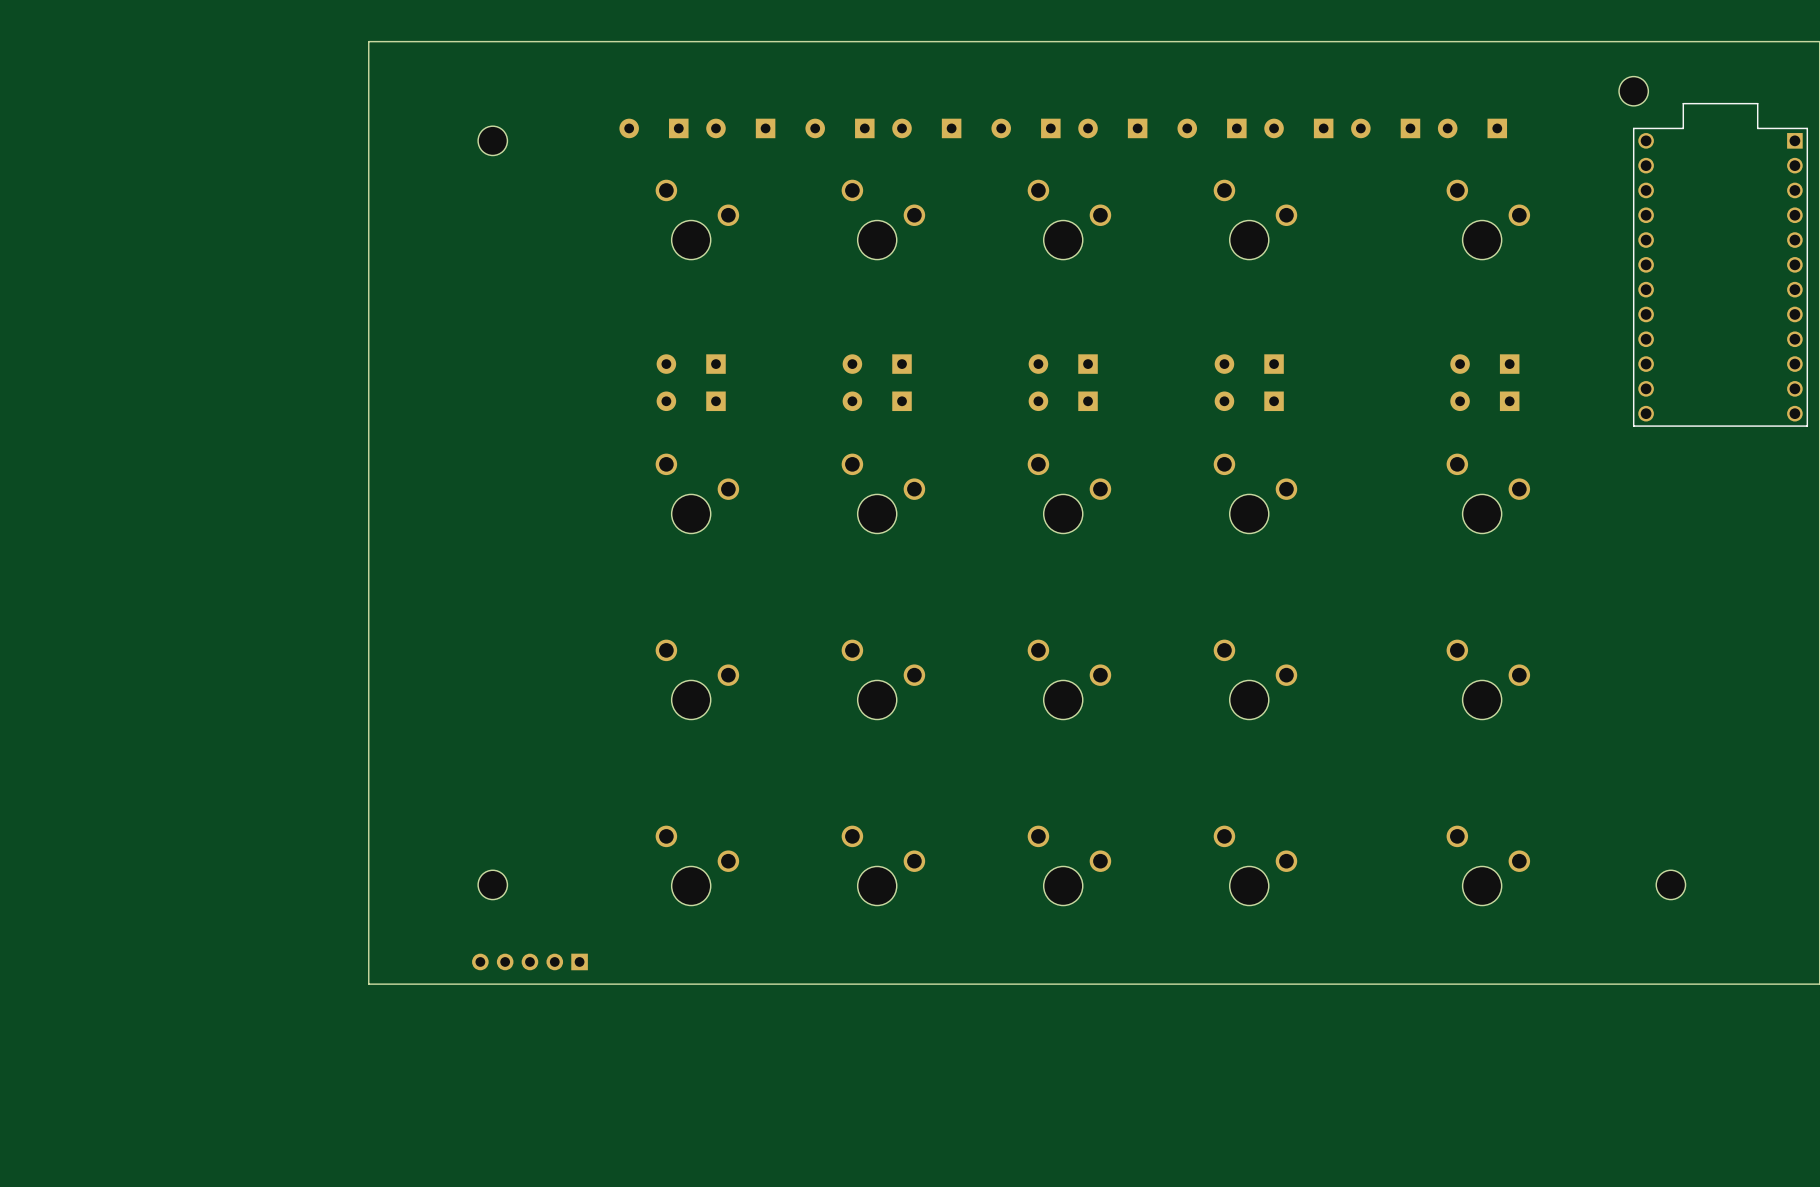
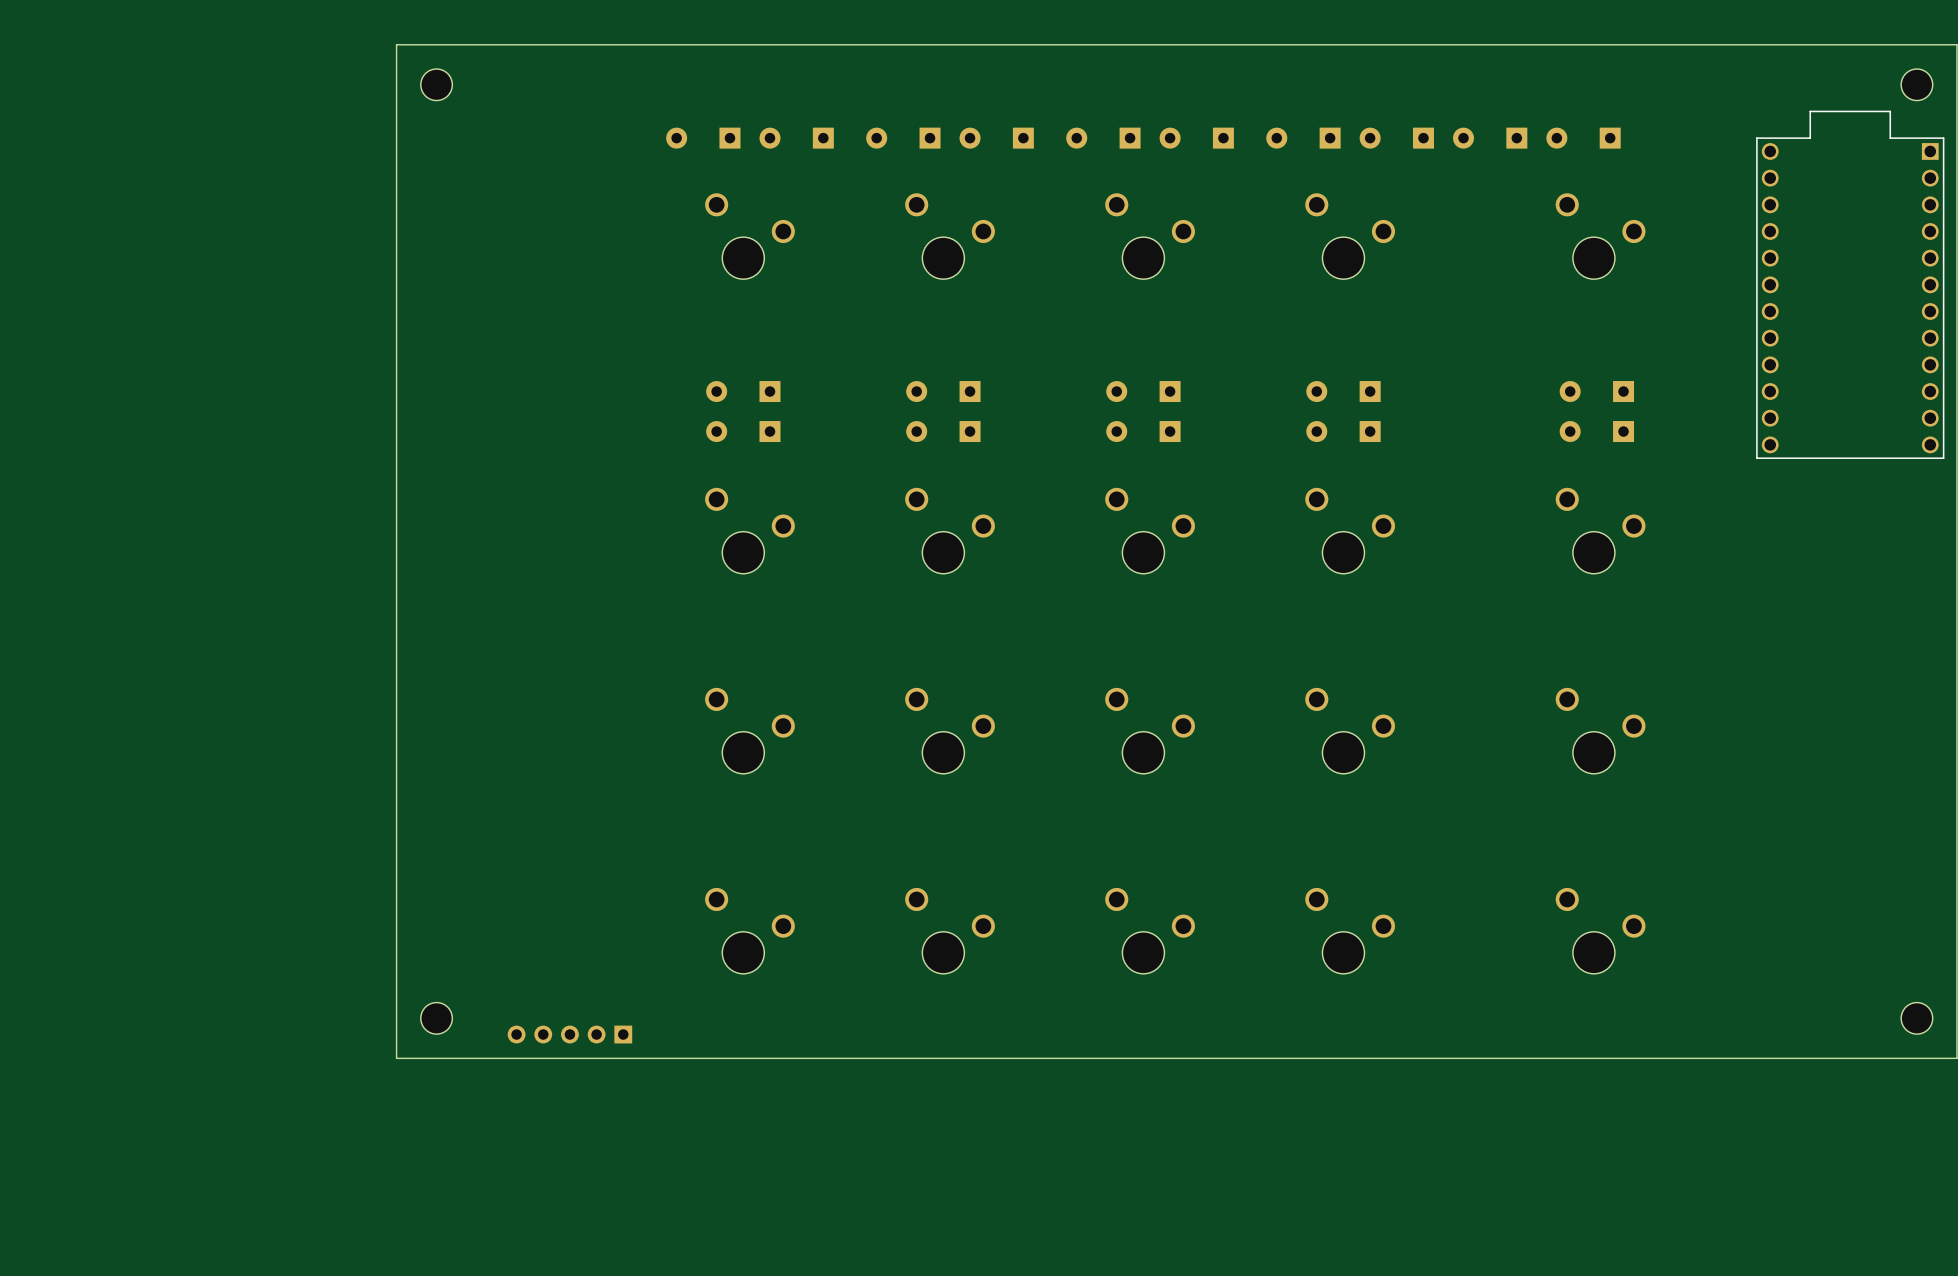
part position: (1633, 91) -> (1916, 84)
part position: (492, 140) -> (436, 84)
part position: (492, 884) -> (436, 1018)
part position: (1670, 884) -> (1916, 1018)

